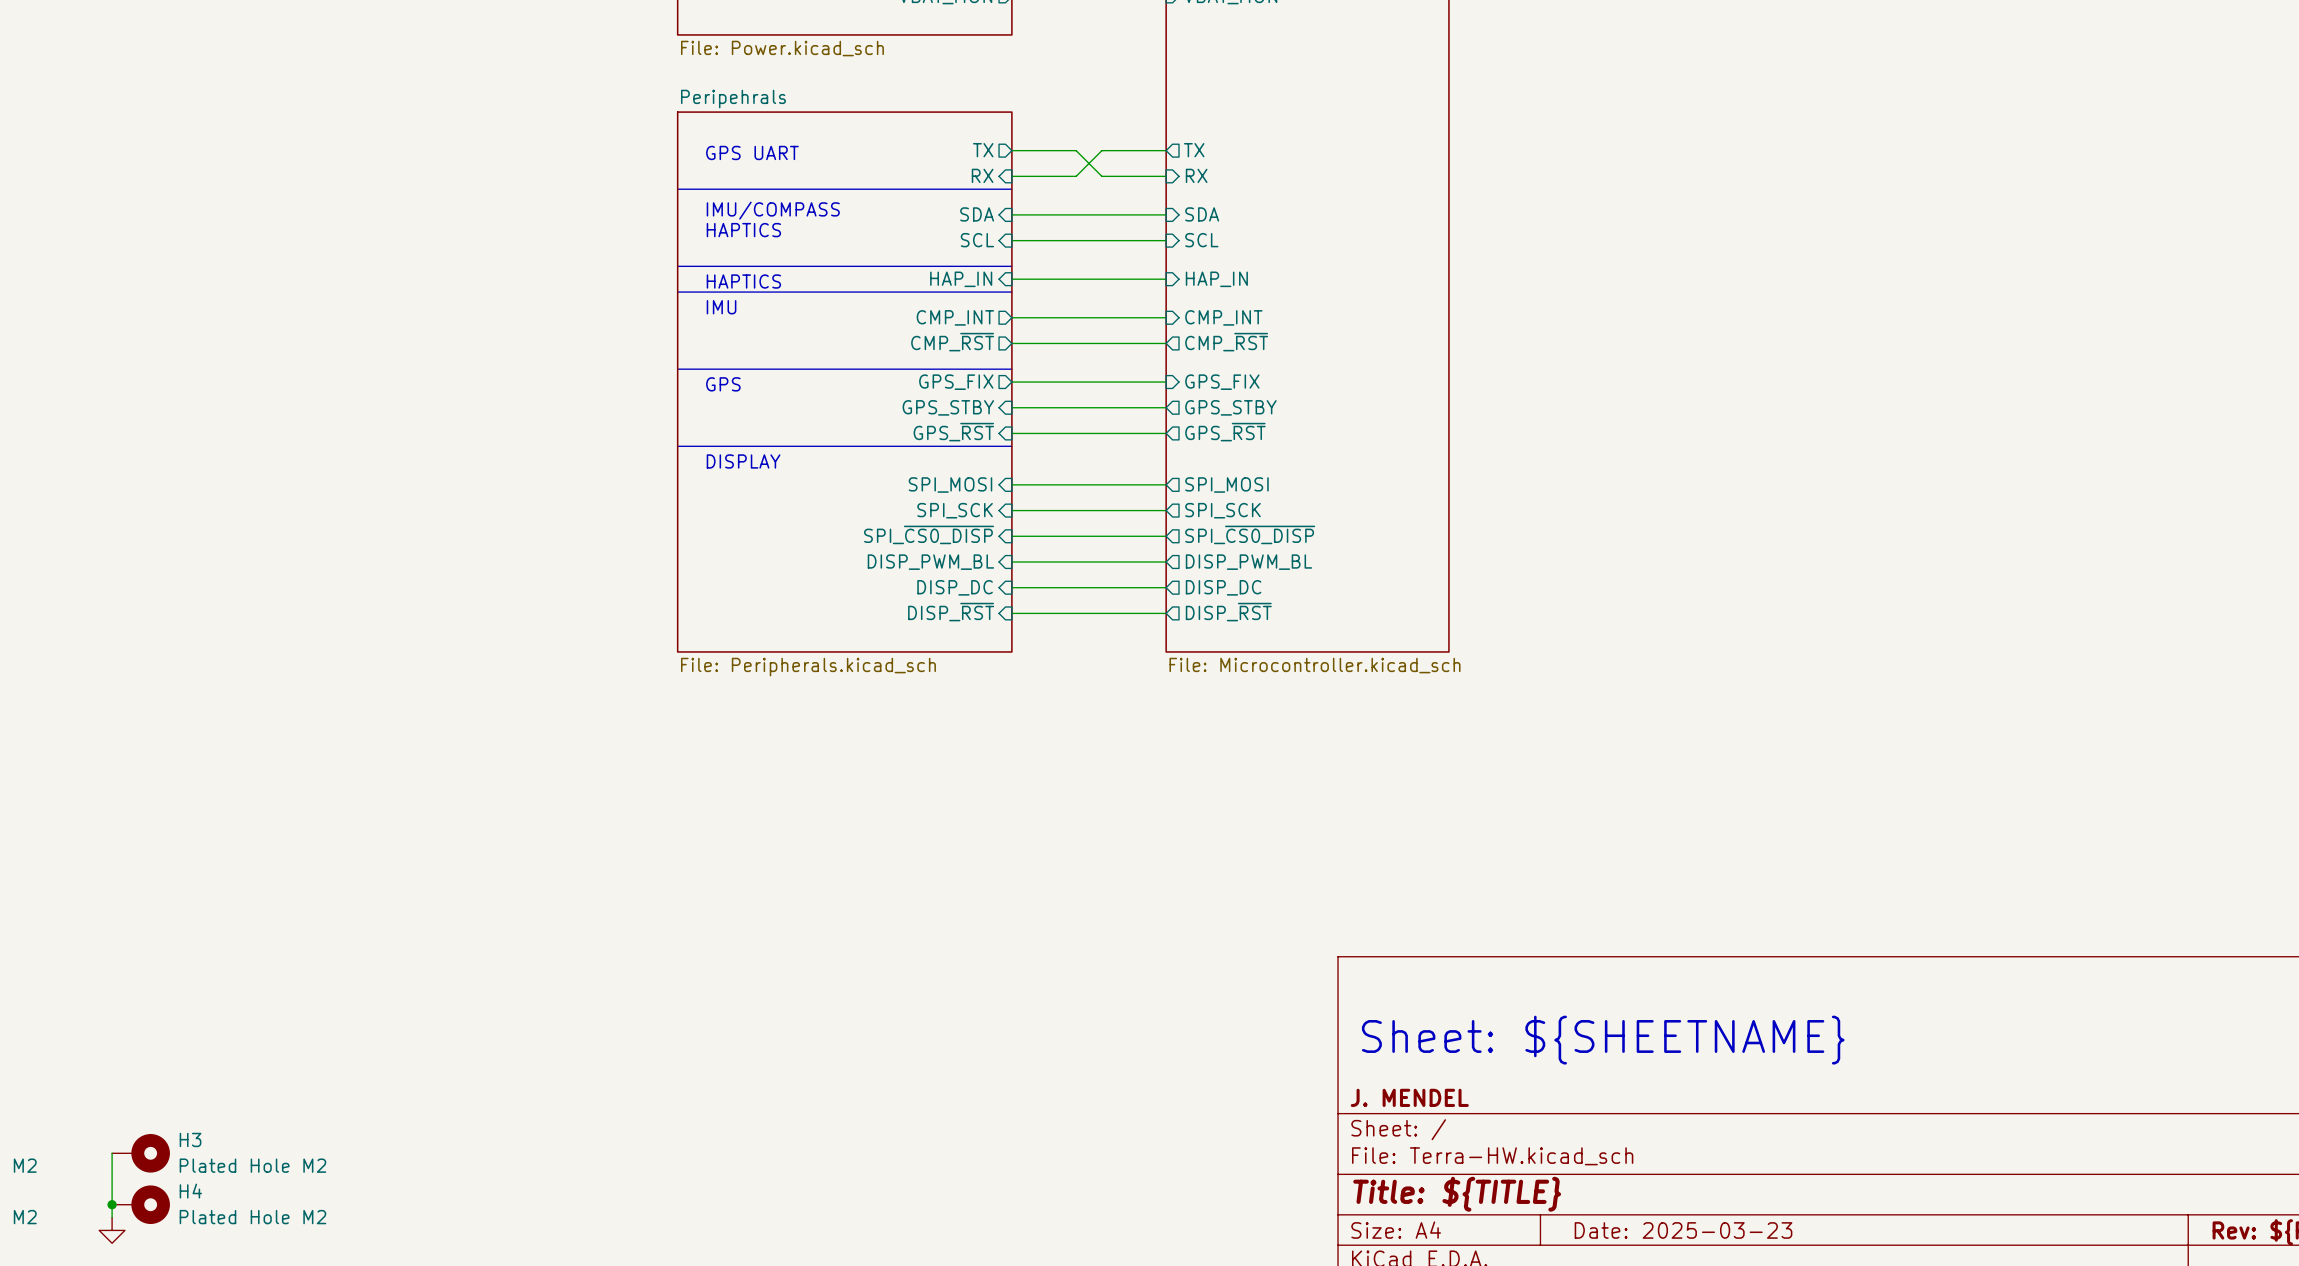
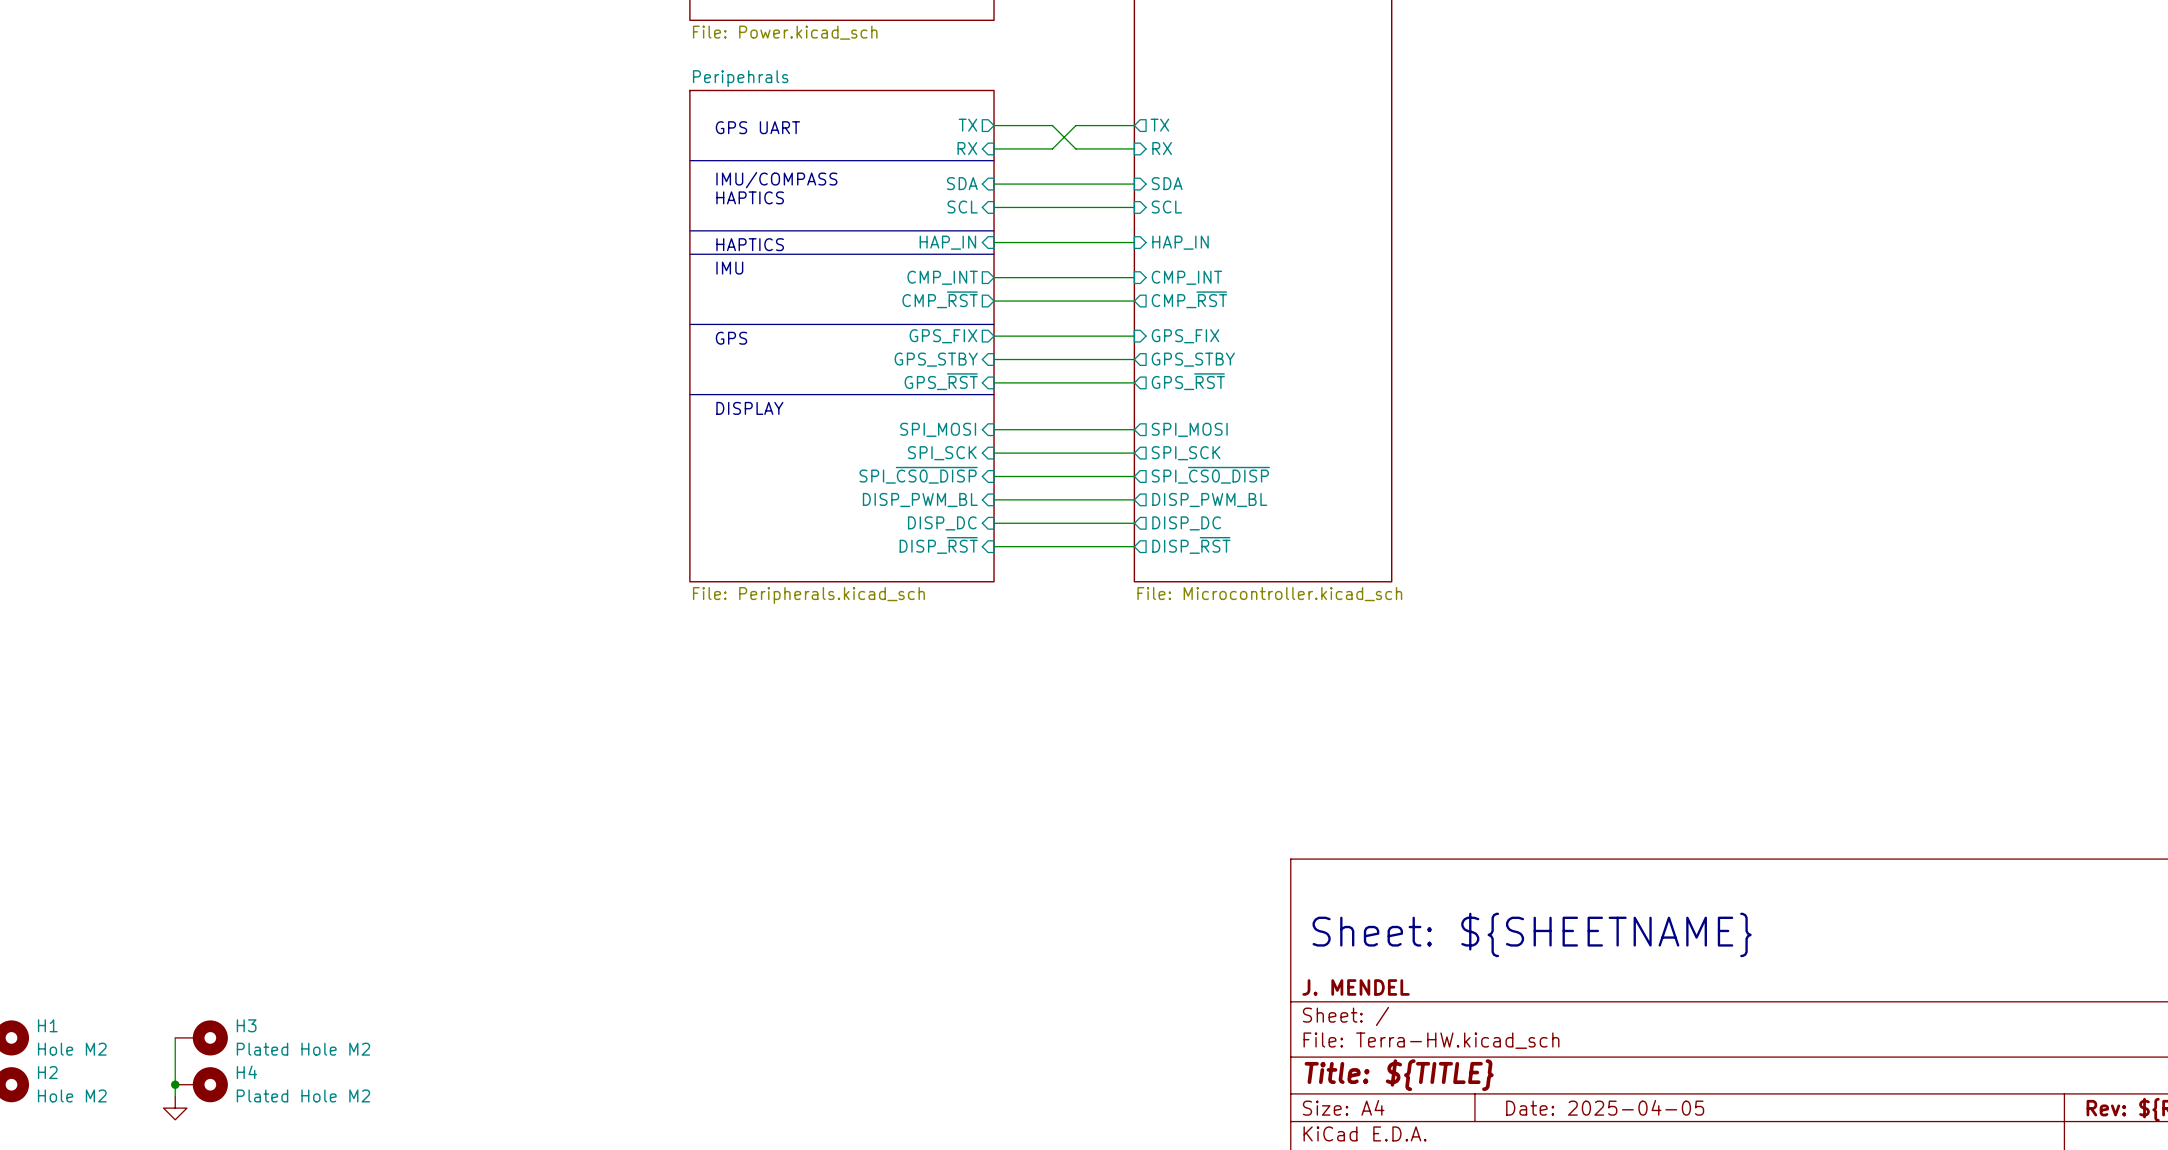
title block: Date: 2025-03-23 (1683, 1230) -> Date: 2025-04-05 (1605, 1107)

